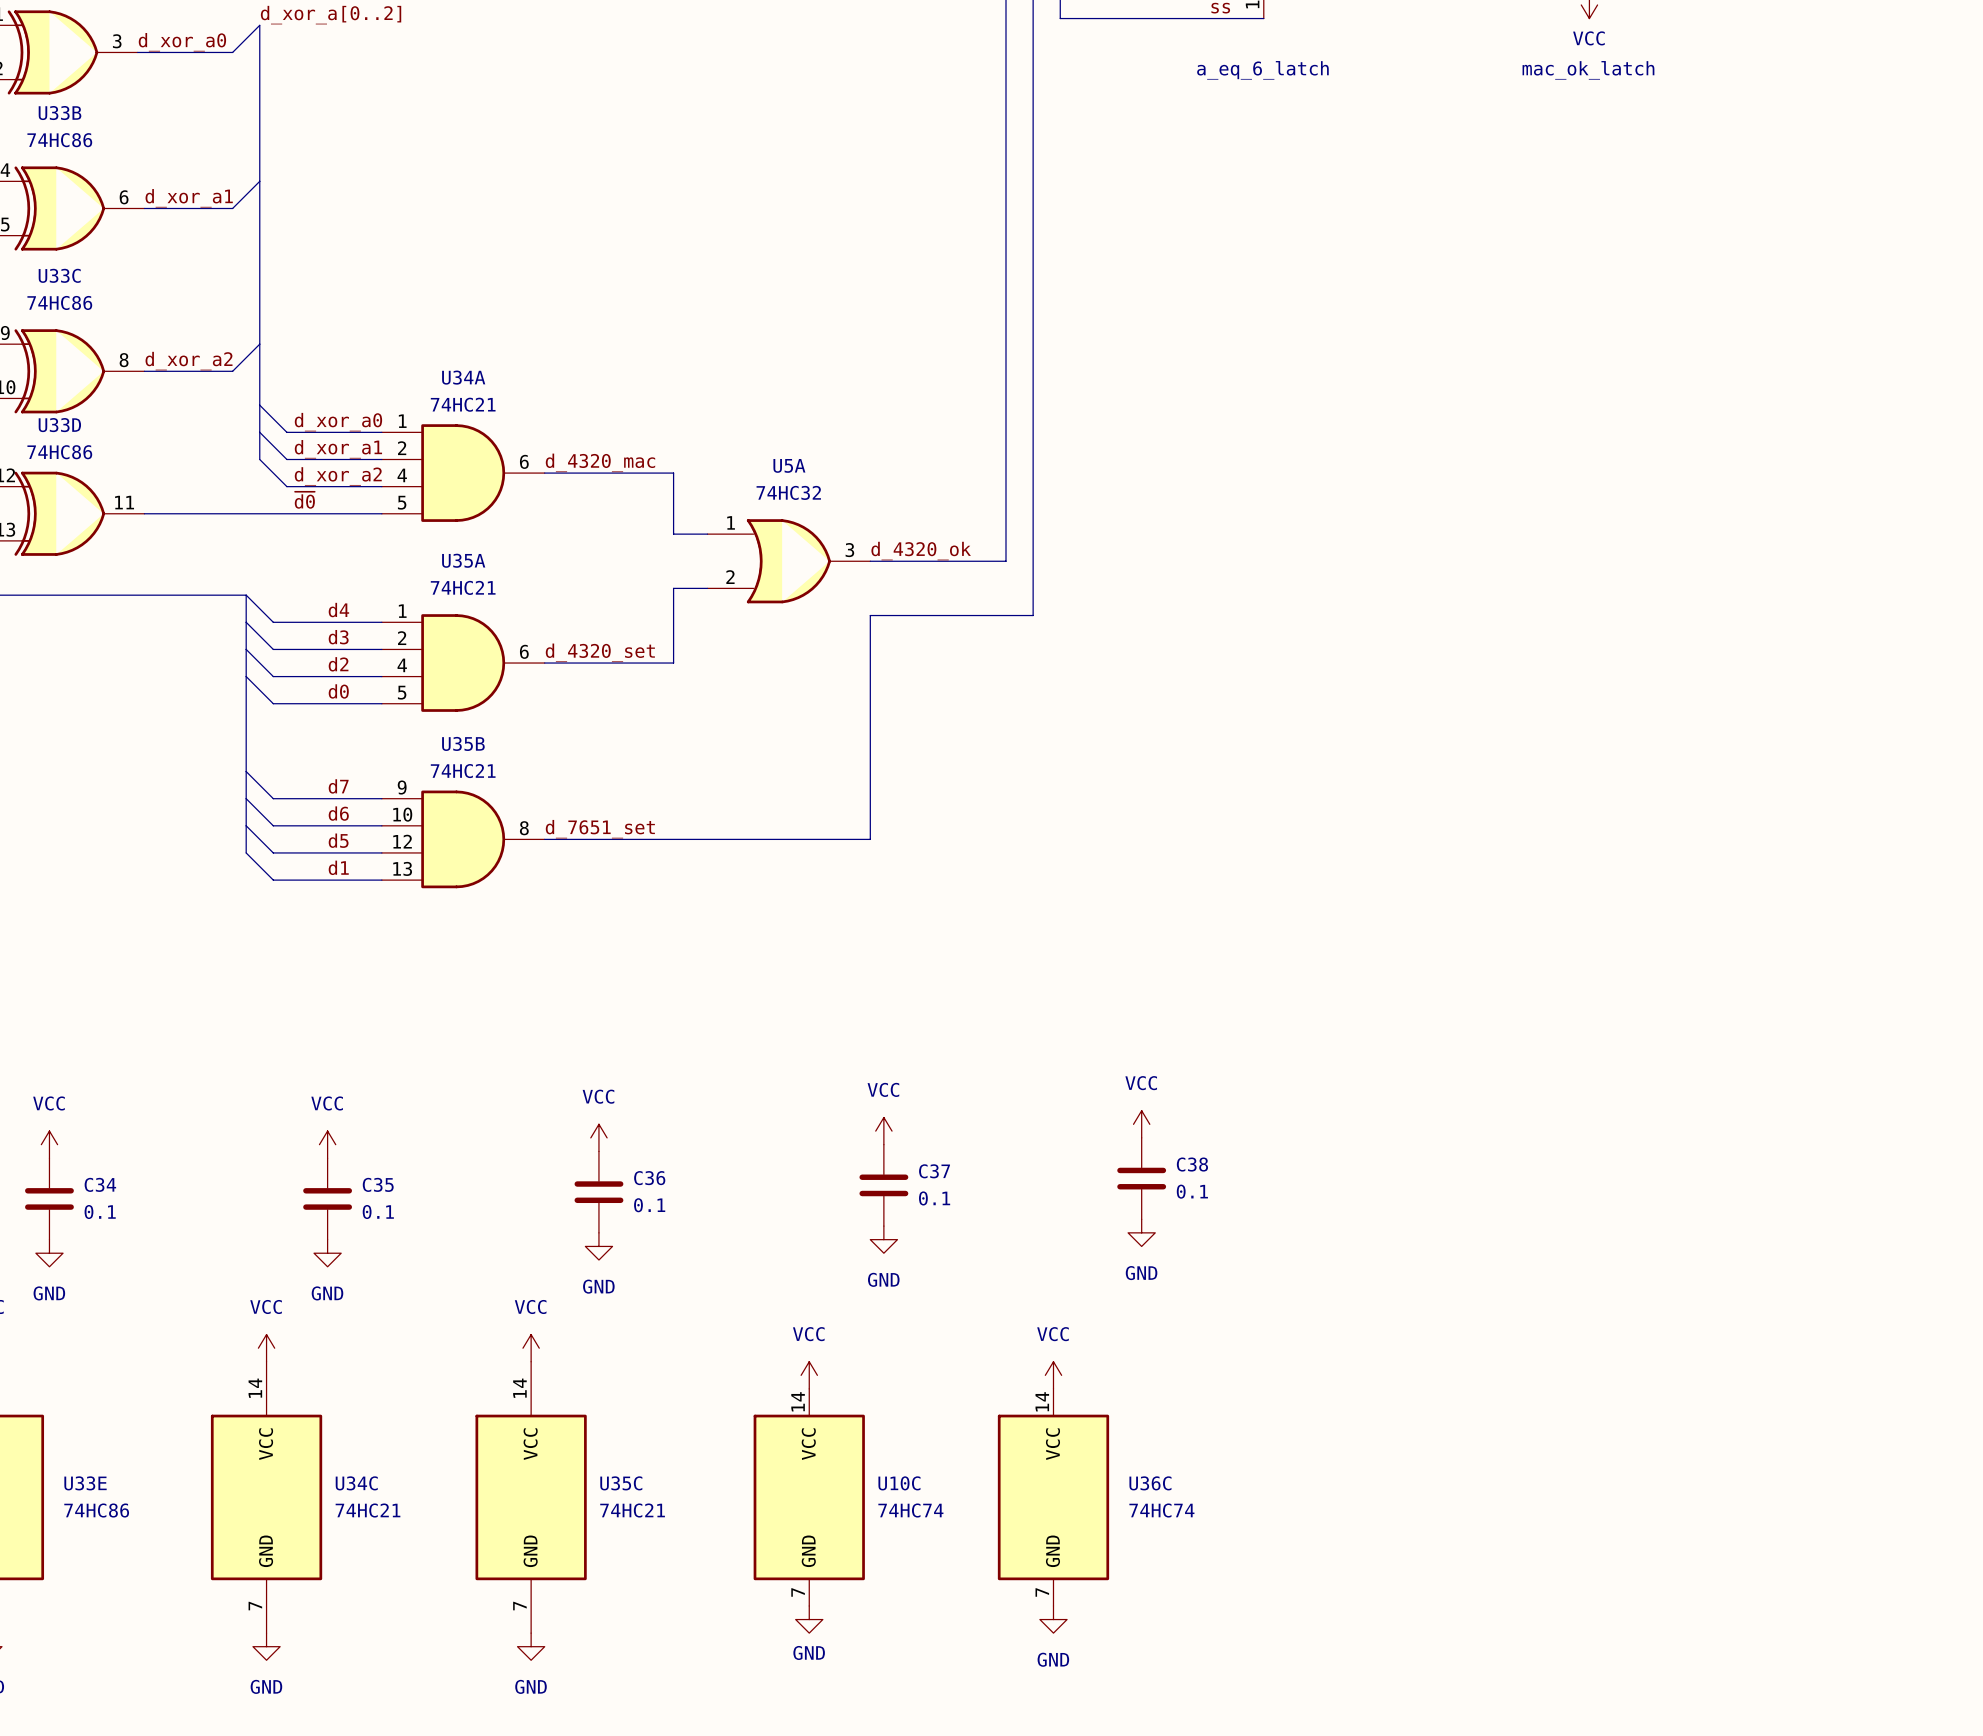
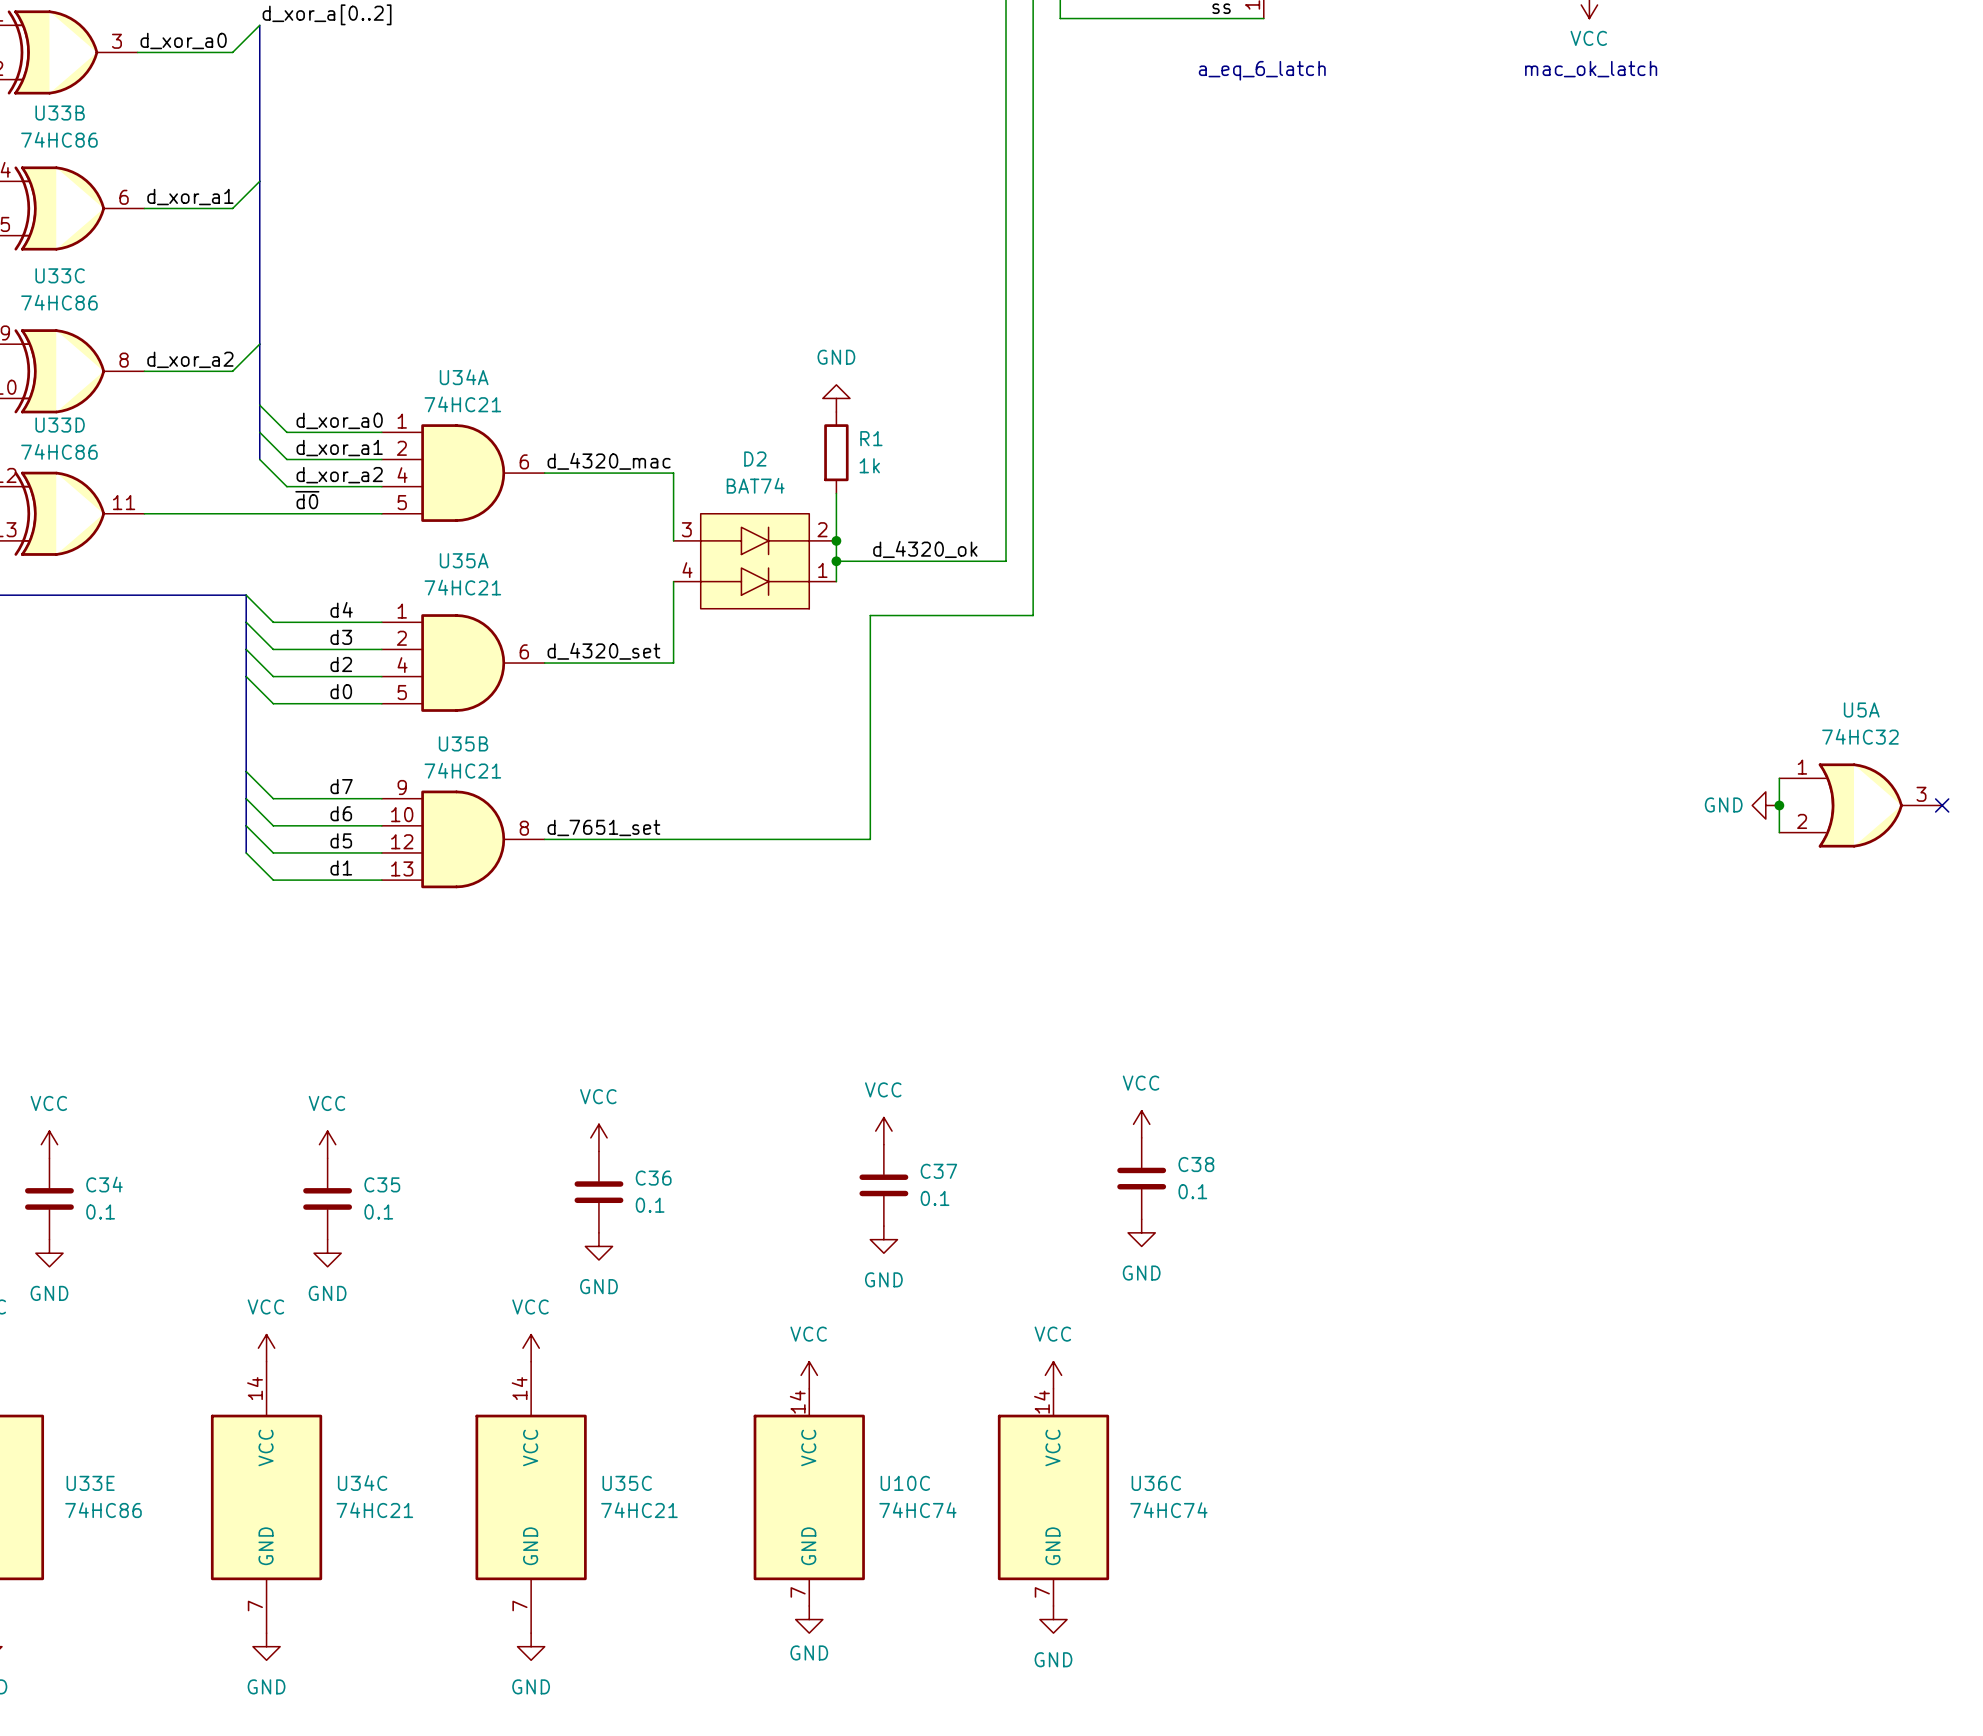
power symbol: none -> GND (836, 398)
R1: none -> 1k (836, 452)
wire: none -> (836, 493) (836, 581)
wire: (673, 534) (707, 534) -> (673, 534) (673, 540)
junction: none -> (836, 540)
D2: none -> BAT74 (754, 561)
U5A position: (788, 561) -> (1860, 805)
junction: none -> (836, 561)
wire: (673, 588) (707, 588) -> (673, 588) (673, 581)
wire: none -> (1779, 778) (1779, 832)
power symbol: none -> GND (1765, 805)
junction: none -> (1779, 805)
no-connect mark: none -> (1942, 805)

